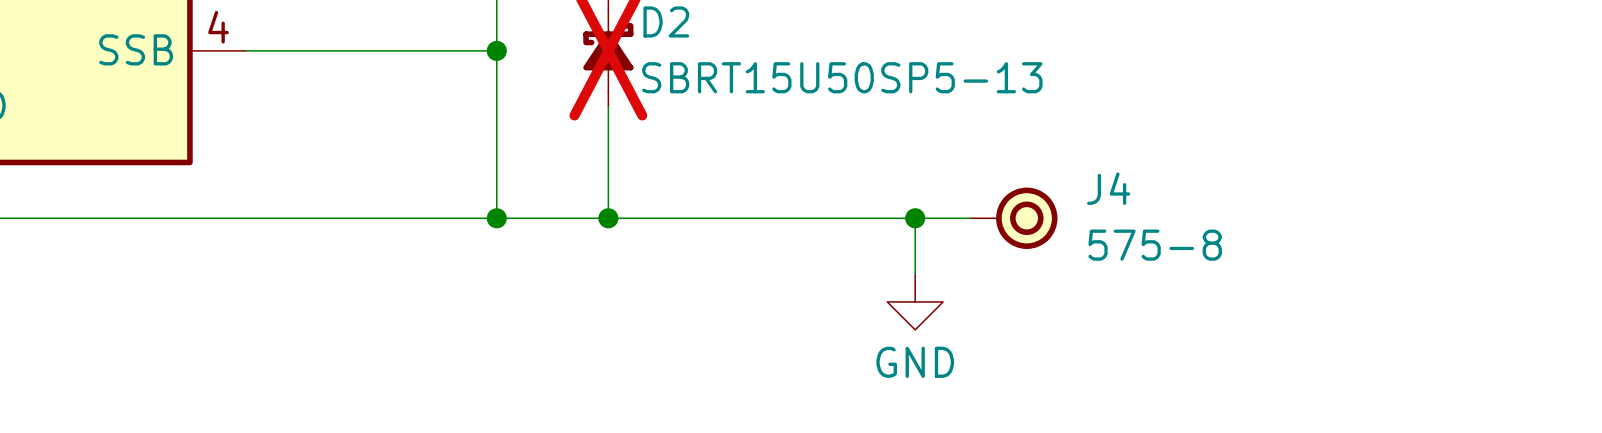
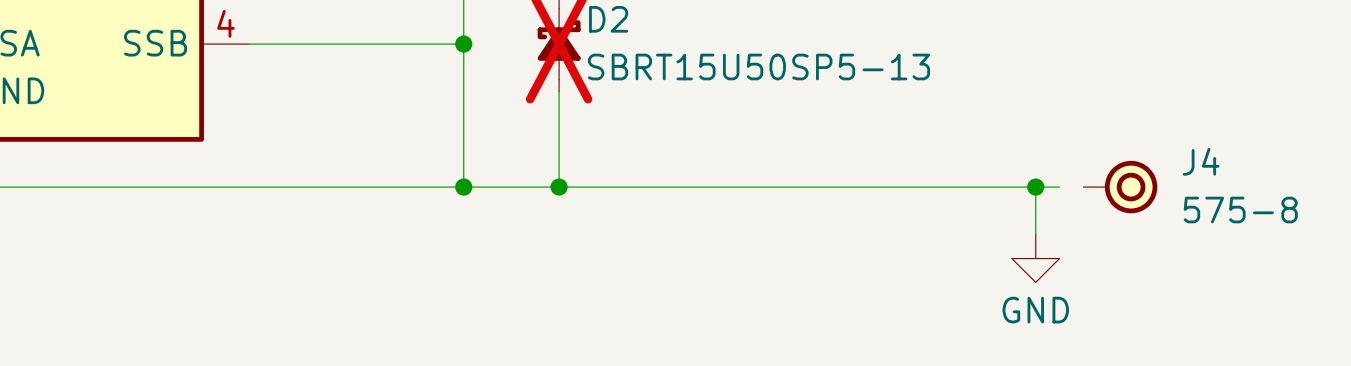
wire: (915, 218) (915, 274) -> (1035, 187) (1035, 234)
junction: (915, 218) -> none
wire: none -> (868, 187) (1059, 187)
J4 position: (1014, 218) -> (1120, 187)
junction: none -> (1035, 187)
power symbol position: GND (915, 301) -> GND (1035, 258)

